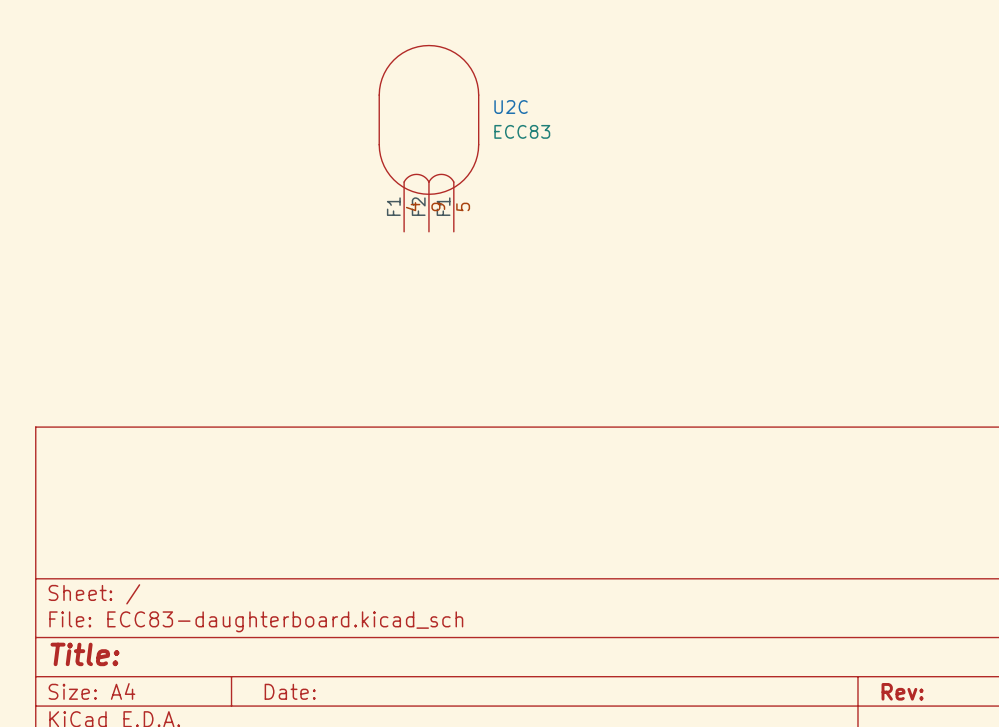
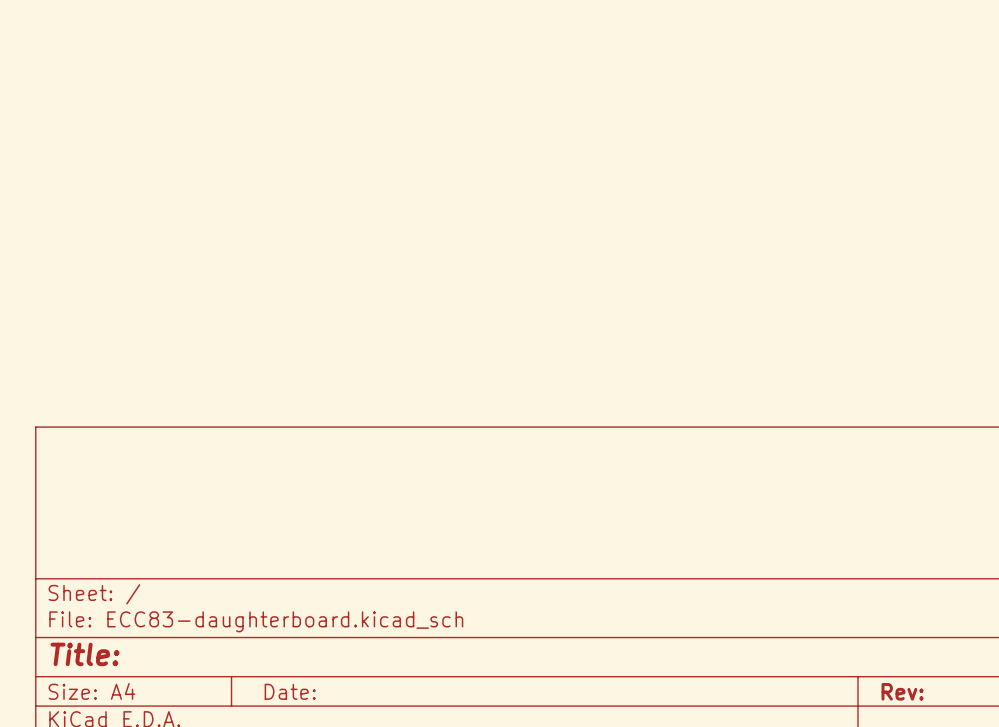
U2C: ECC83 (428, 138) -> none

